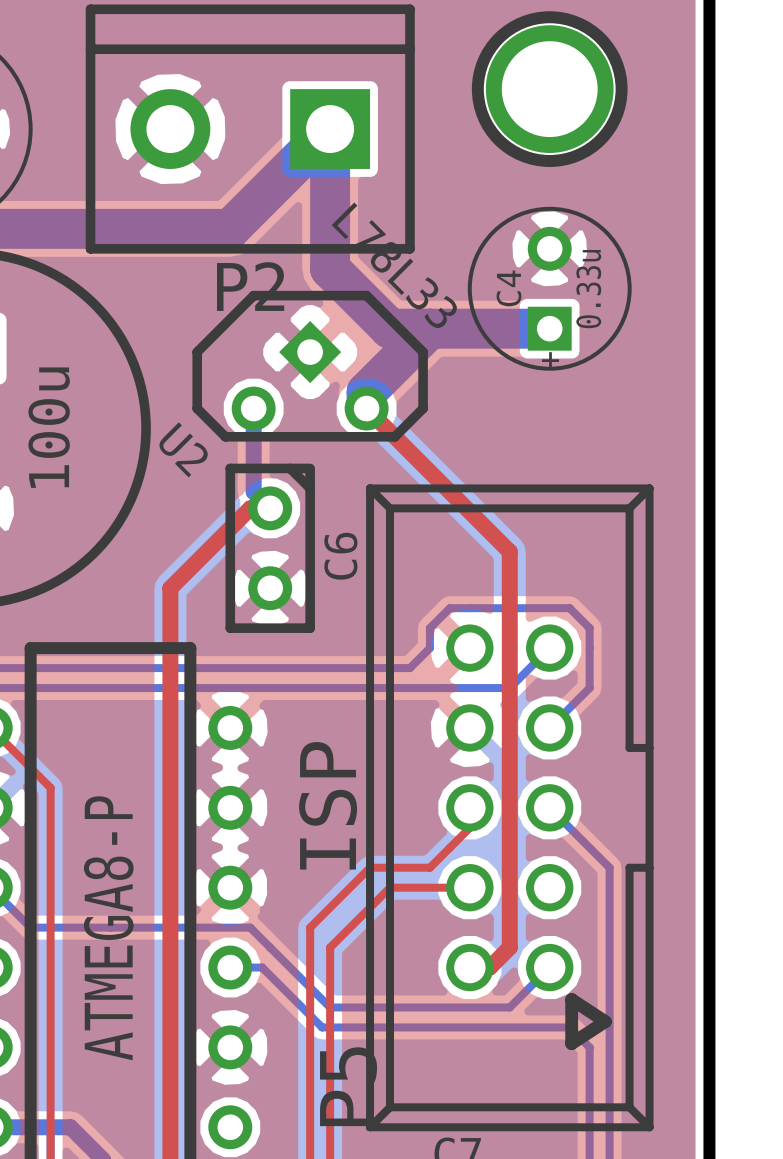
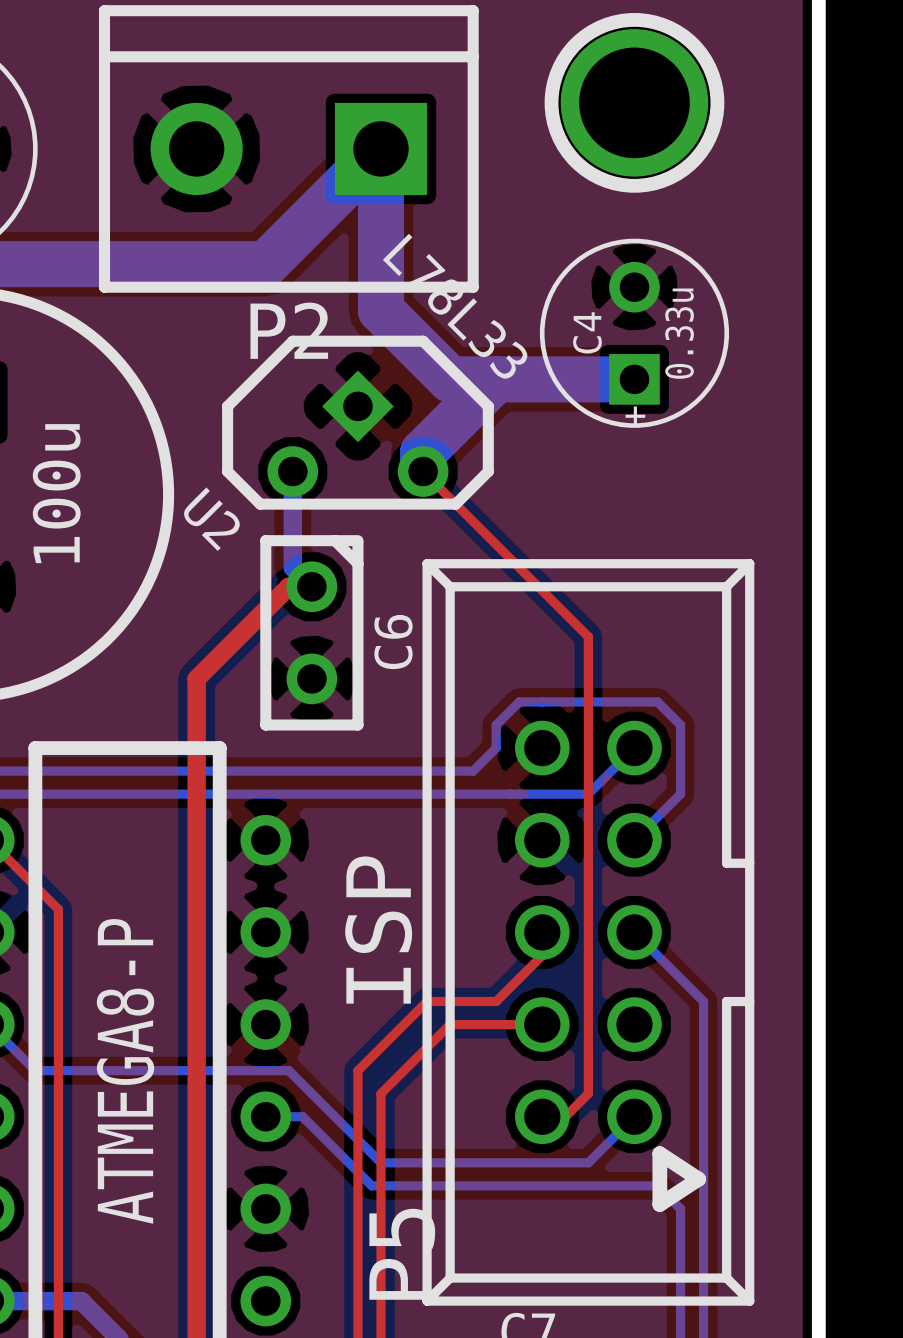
top track width: thick (366, 408) (509, 551) (509, 947) (489, 967) (469, 967) -> thin (423, 471) (588, 636) (588, 1093) (565, 1116) (542, 1116)

